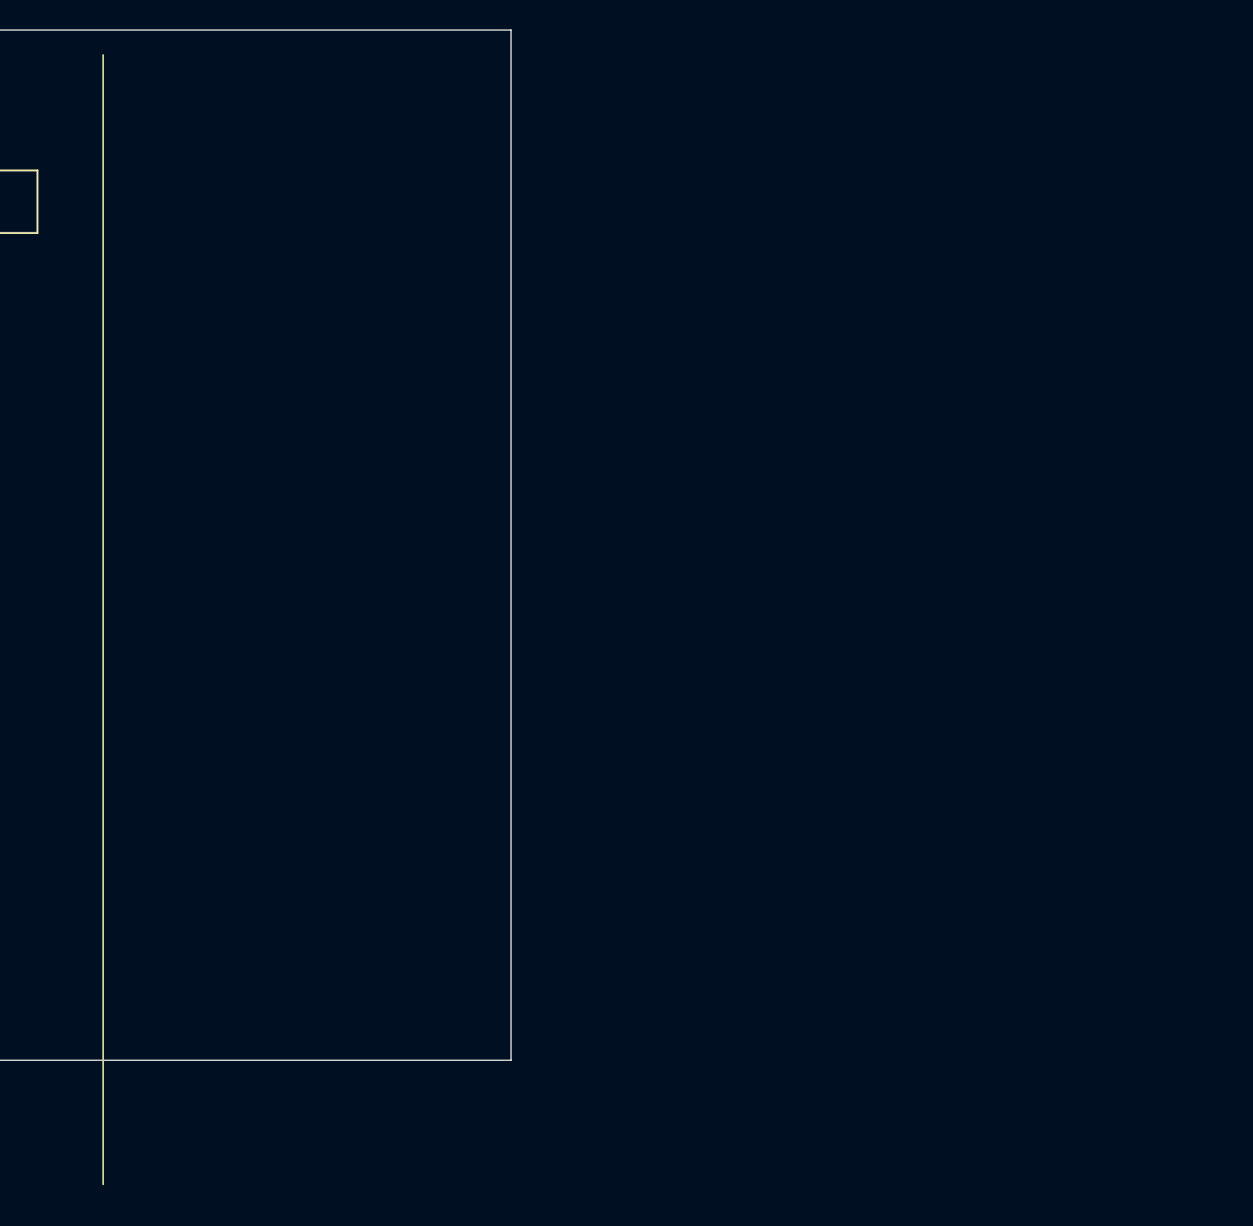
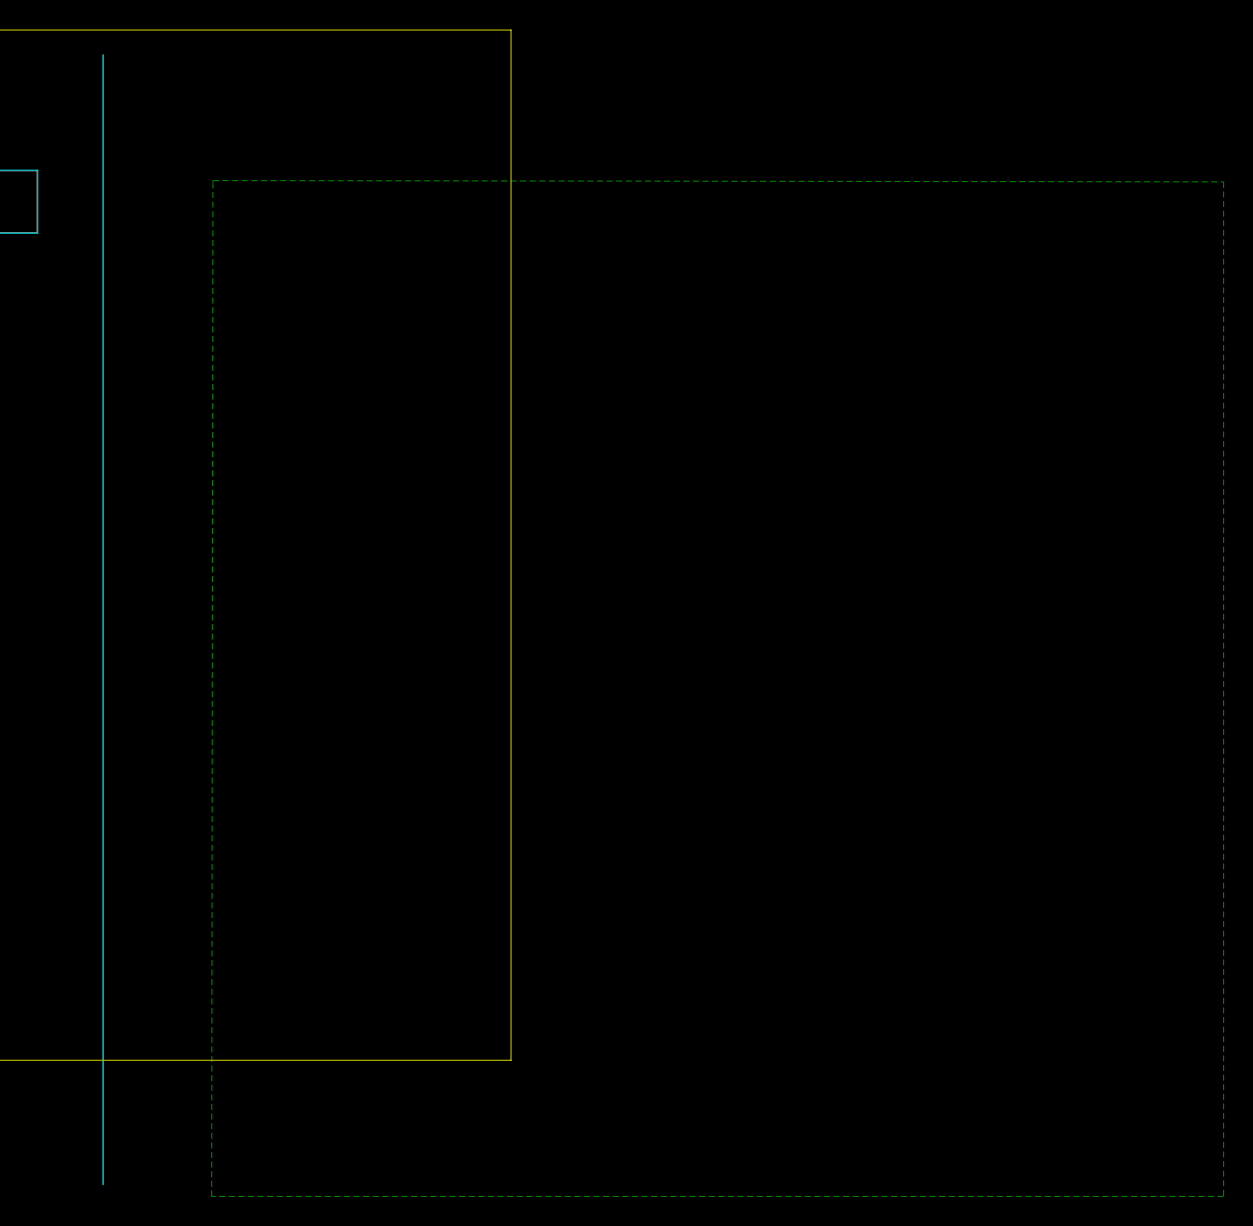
bottom zone outline: none -> (212, 180) (211, 1196) (1223, 1196) (1223, 181) (212, 180)

